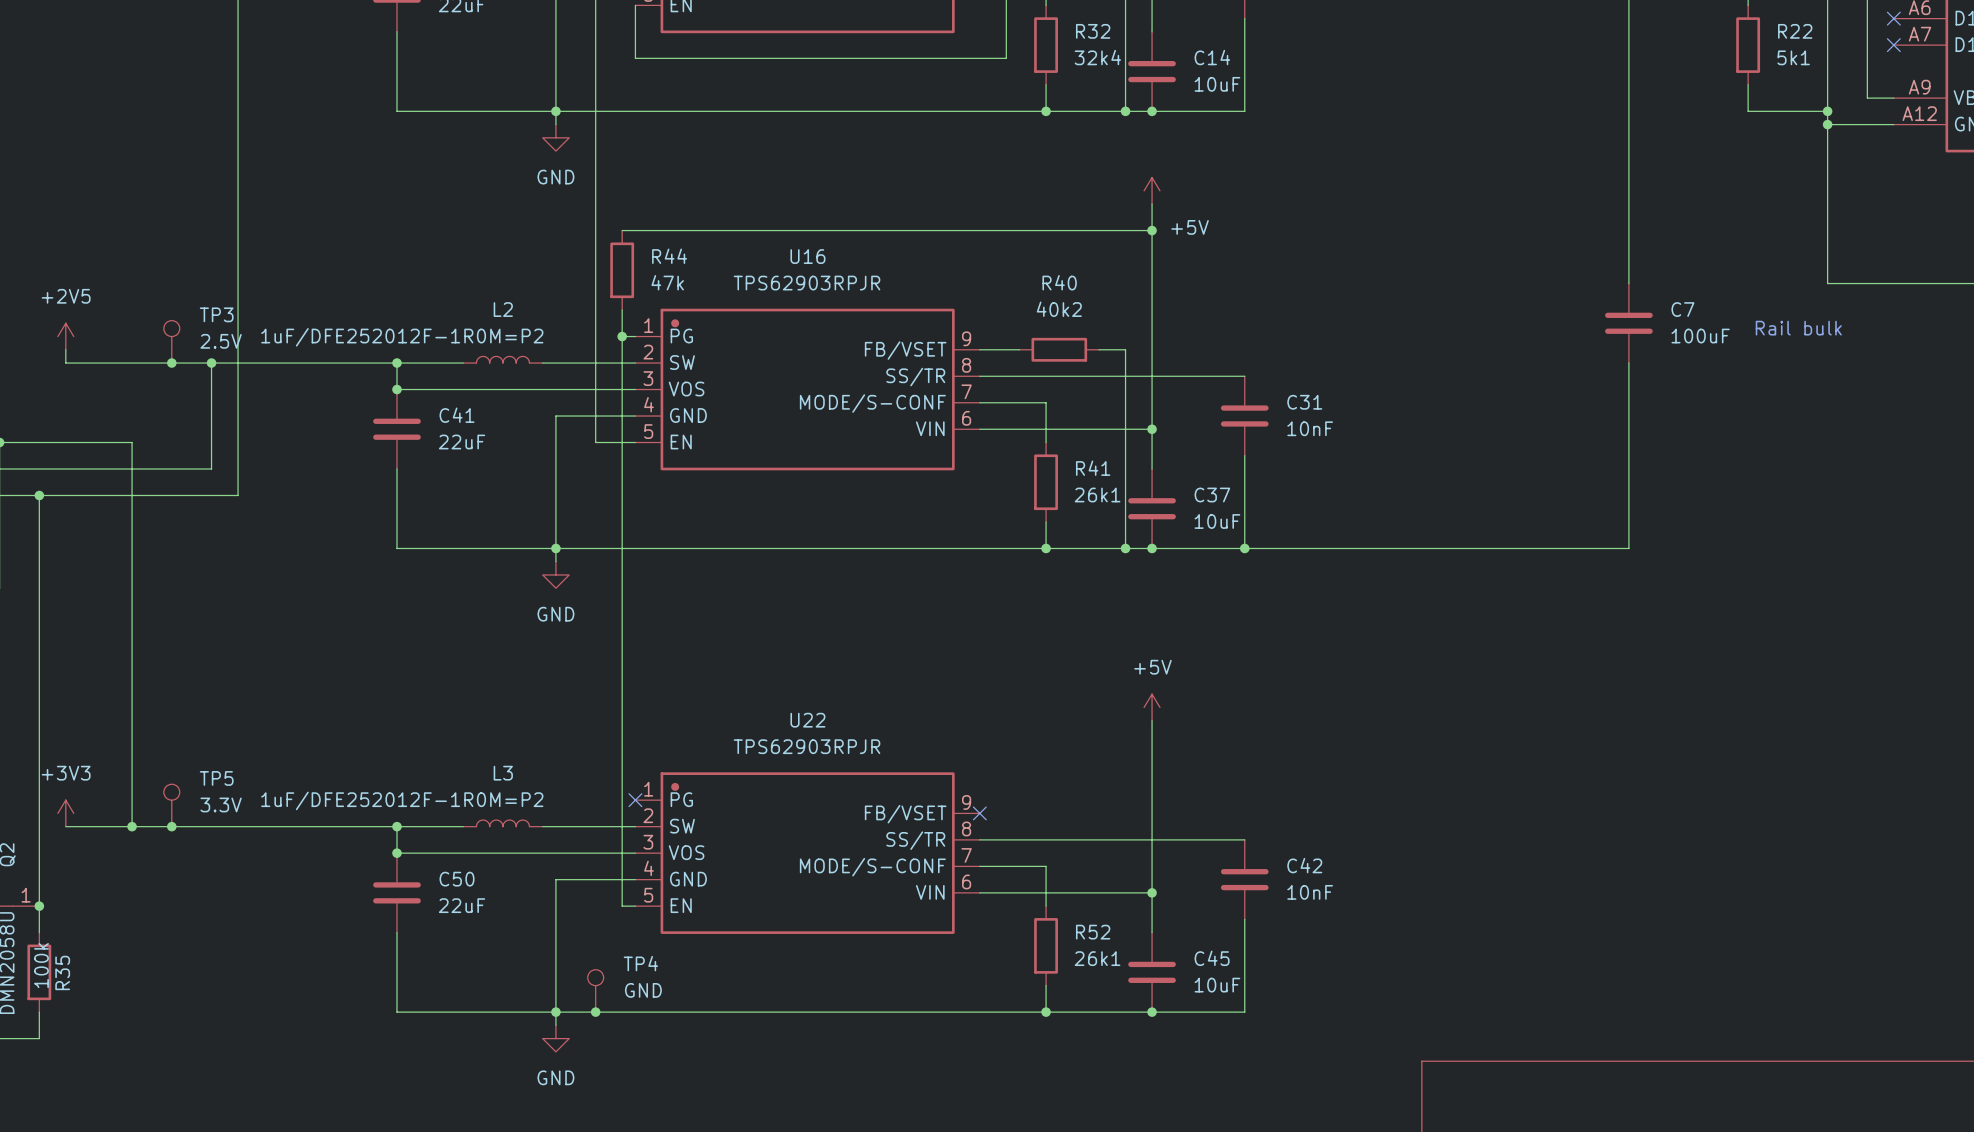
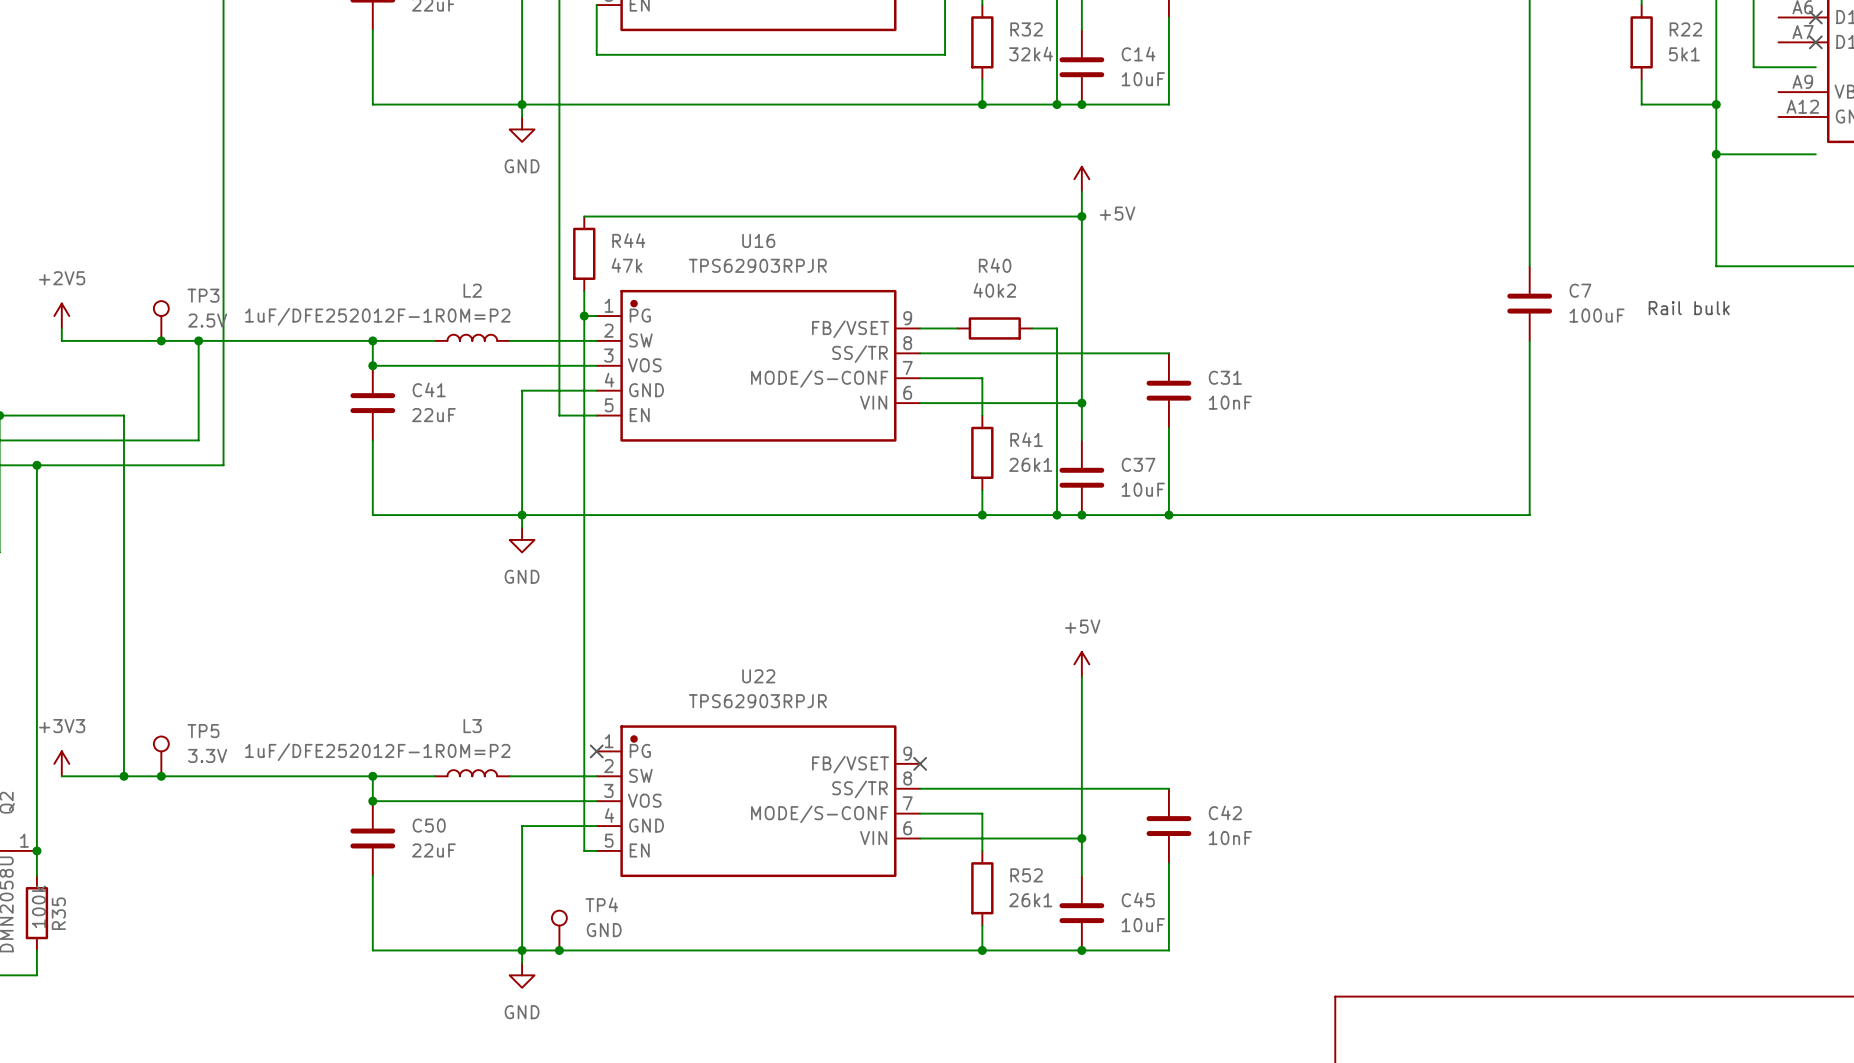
no-connect mark: (1893, 18) -> none
no-connect mark: none -> (1815, 17)
no-connect mark: (1893, 45) -> none
no-connect mark: none -> (1815, 42)
wire: (1867, 71) (1867, 98) (1893, 98) -> (1753, 67) (1815, 67)
wire: (1827, 124) (1893, 124) -> none
junction position: (1827, 124) -> (1716, 154)
wire: none -> (1716, 154) (1815, 154)

